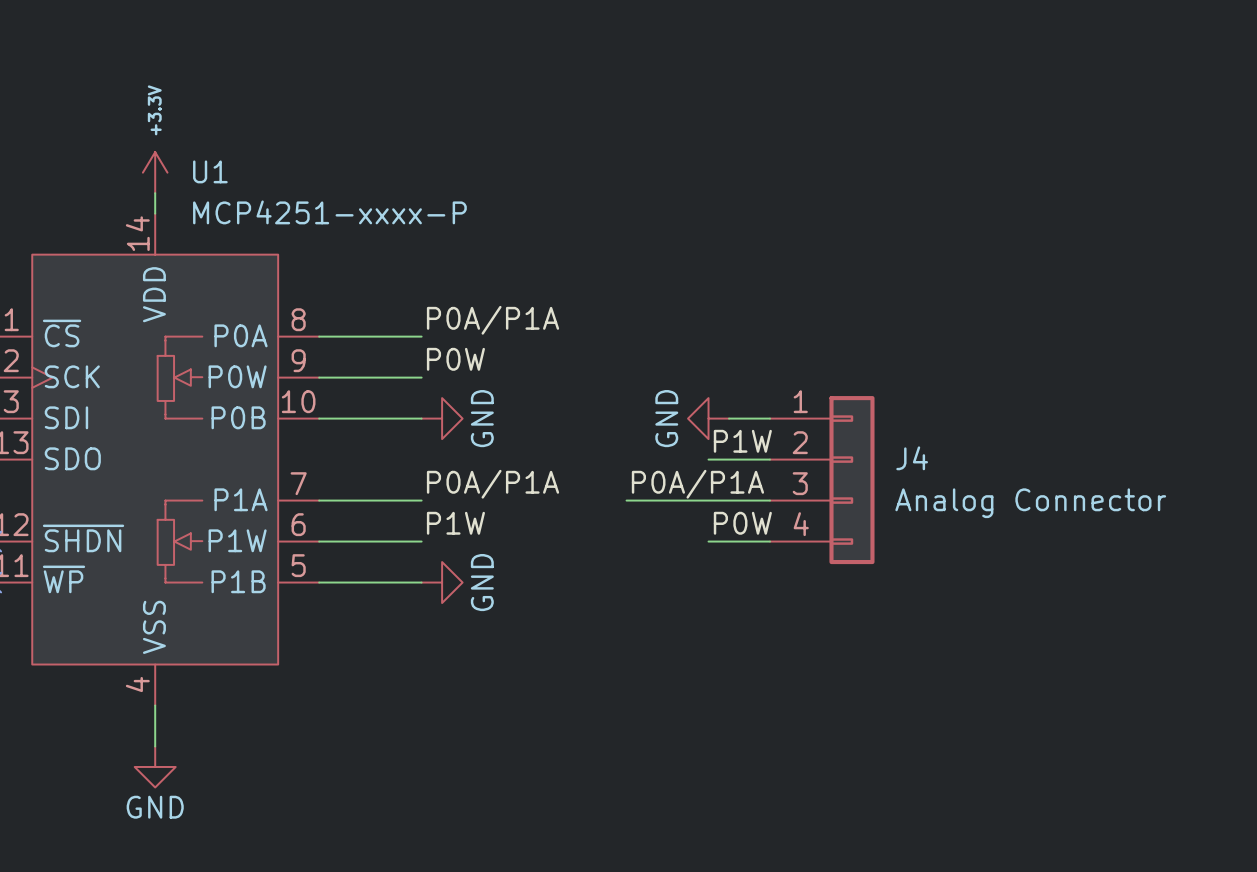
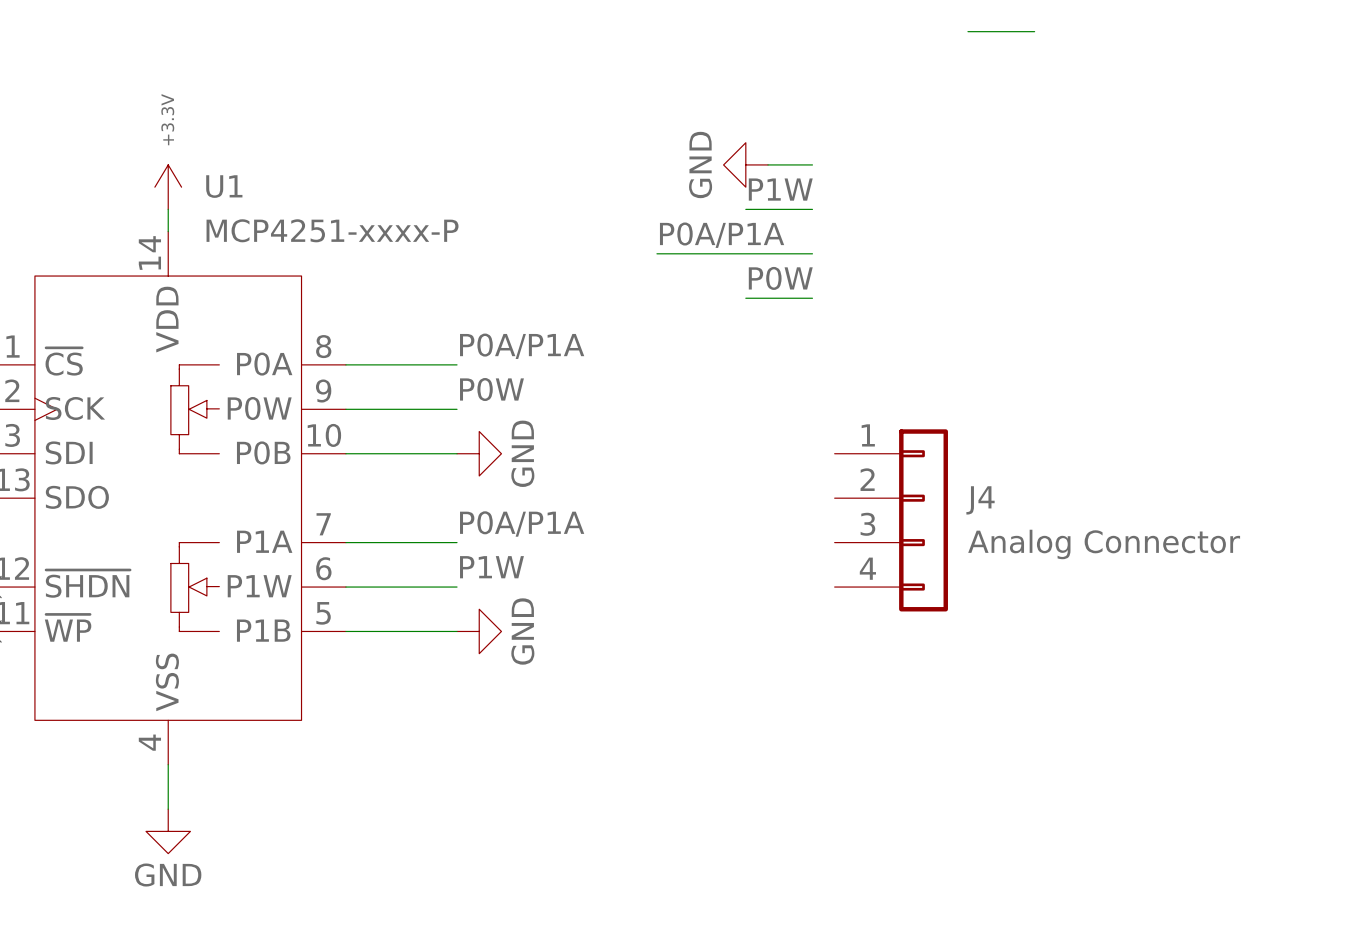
wire: none -> (967, 31) (1034, 31)
power symbol position: GND (708, 418) -> GND (745, 164)
wire: (729, 418) (770, 418) -> (768, 164) (812, 164)
label position: P1W (742, 441) -> P1W (780, 189)
wire: (708, 459) (770, 459) -> (745, 209) (812, 209)
label position: P0A/P1A (697, 484) -> P0A/P1A (722, 235)
wire: (626, 500) (770, 500) -> (656, 253) (812, 253)
label position: P0W (742, 523) -> P0W (780, 278)
wire: (708, 541) (770, 541) -> (745, 298) (812, 298)

